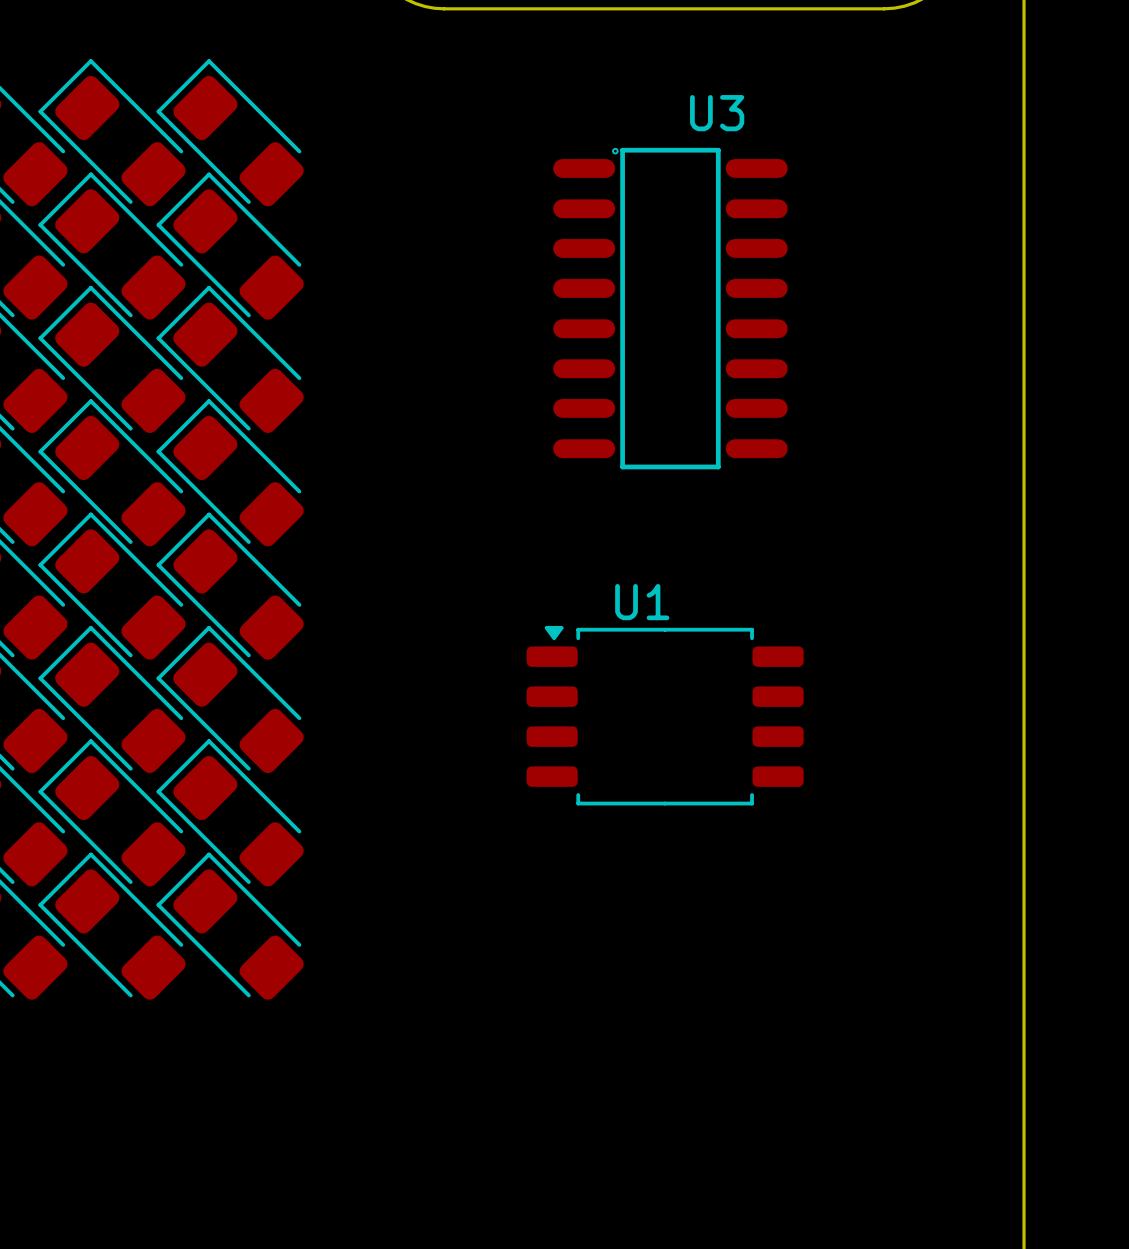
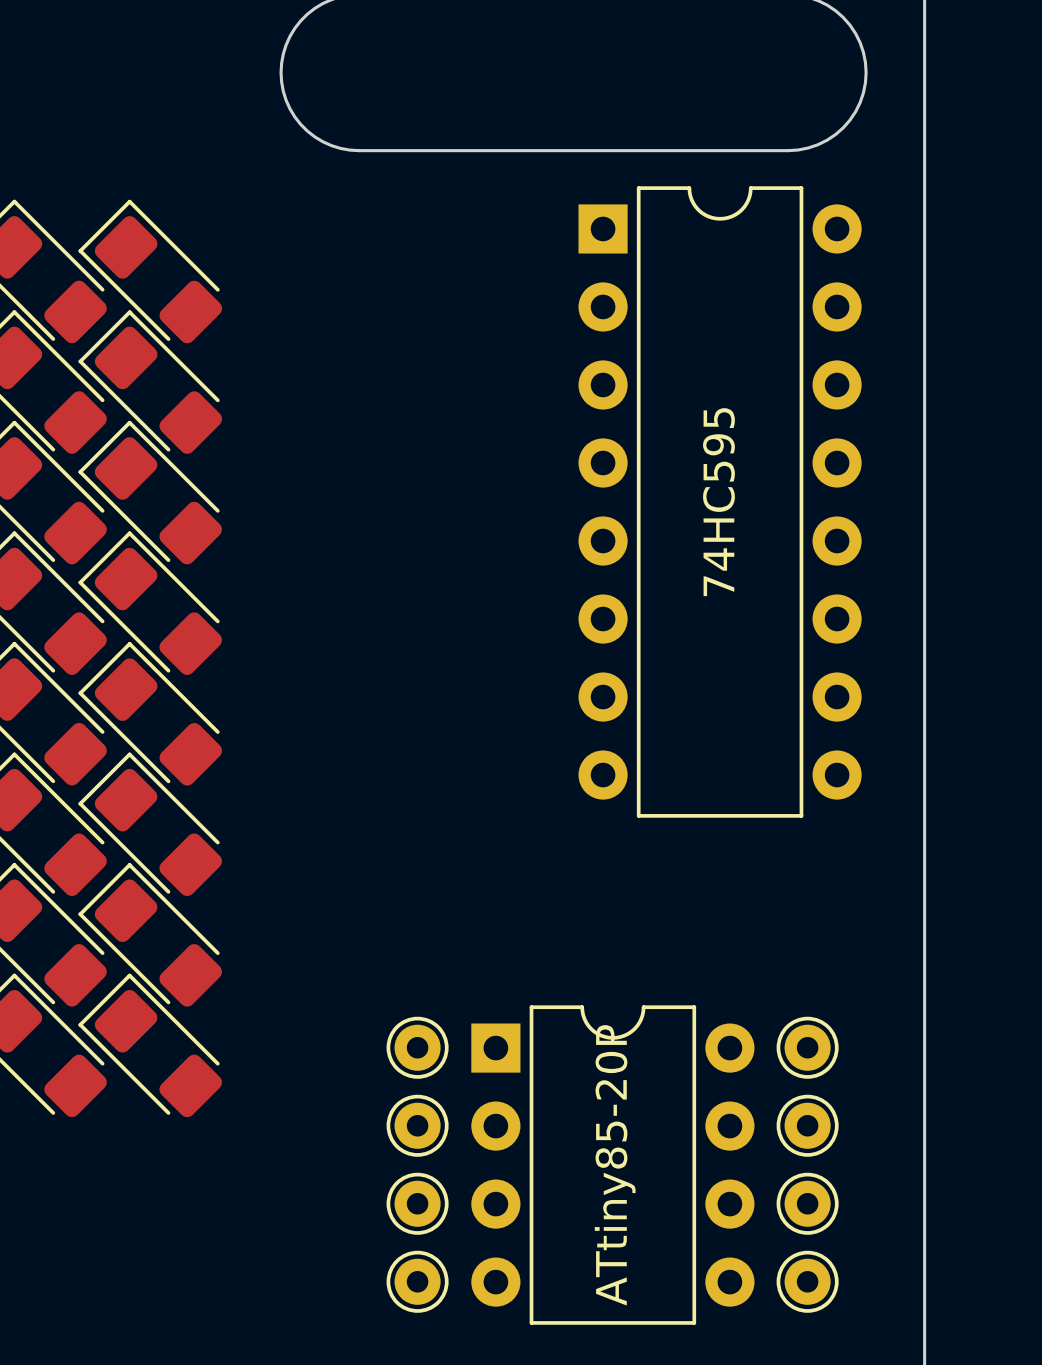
U3: (670, 308) -> none
part: none -> 74HC595 (720, 502)
U1: (665, 715) -> none
part: none -> (417, 1047)
part: none -> (807, 1047)
part: none -> (417, 1125)
part: none -> (807, 1125)
part: none -> ATtiny85-20P (612, 1165)
part: none -> (417, 1203)
part: none -> (807, 1203)
part: none -> (417, 1281)
part: none -> (807, 1281)

